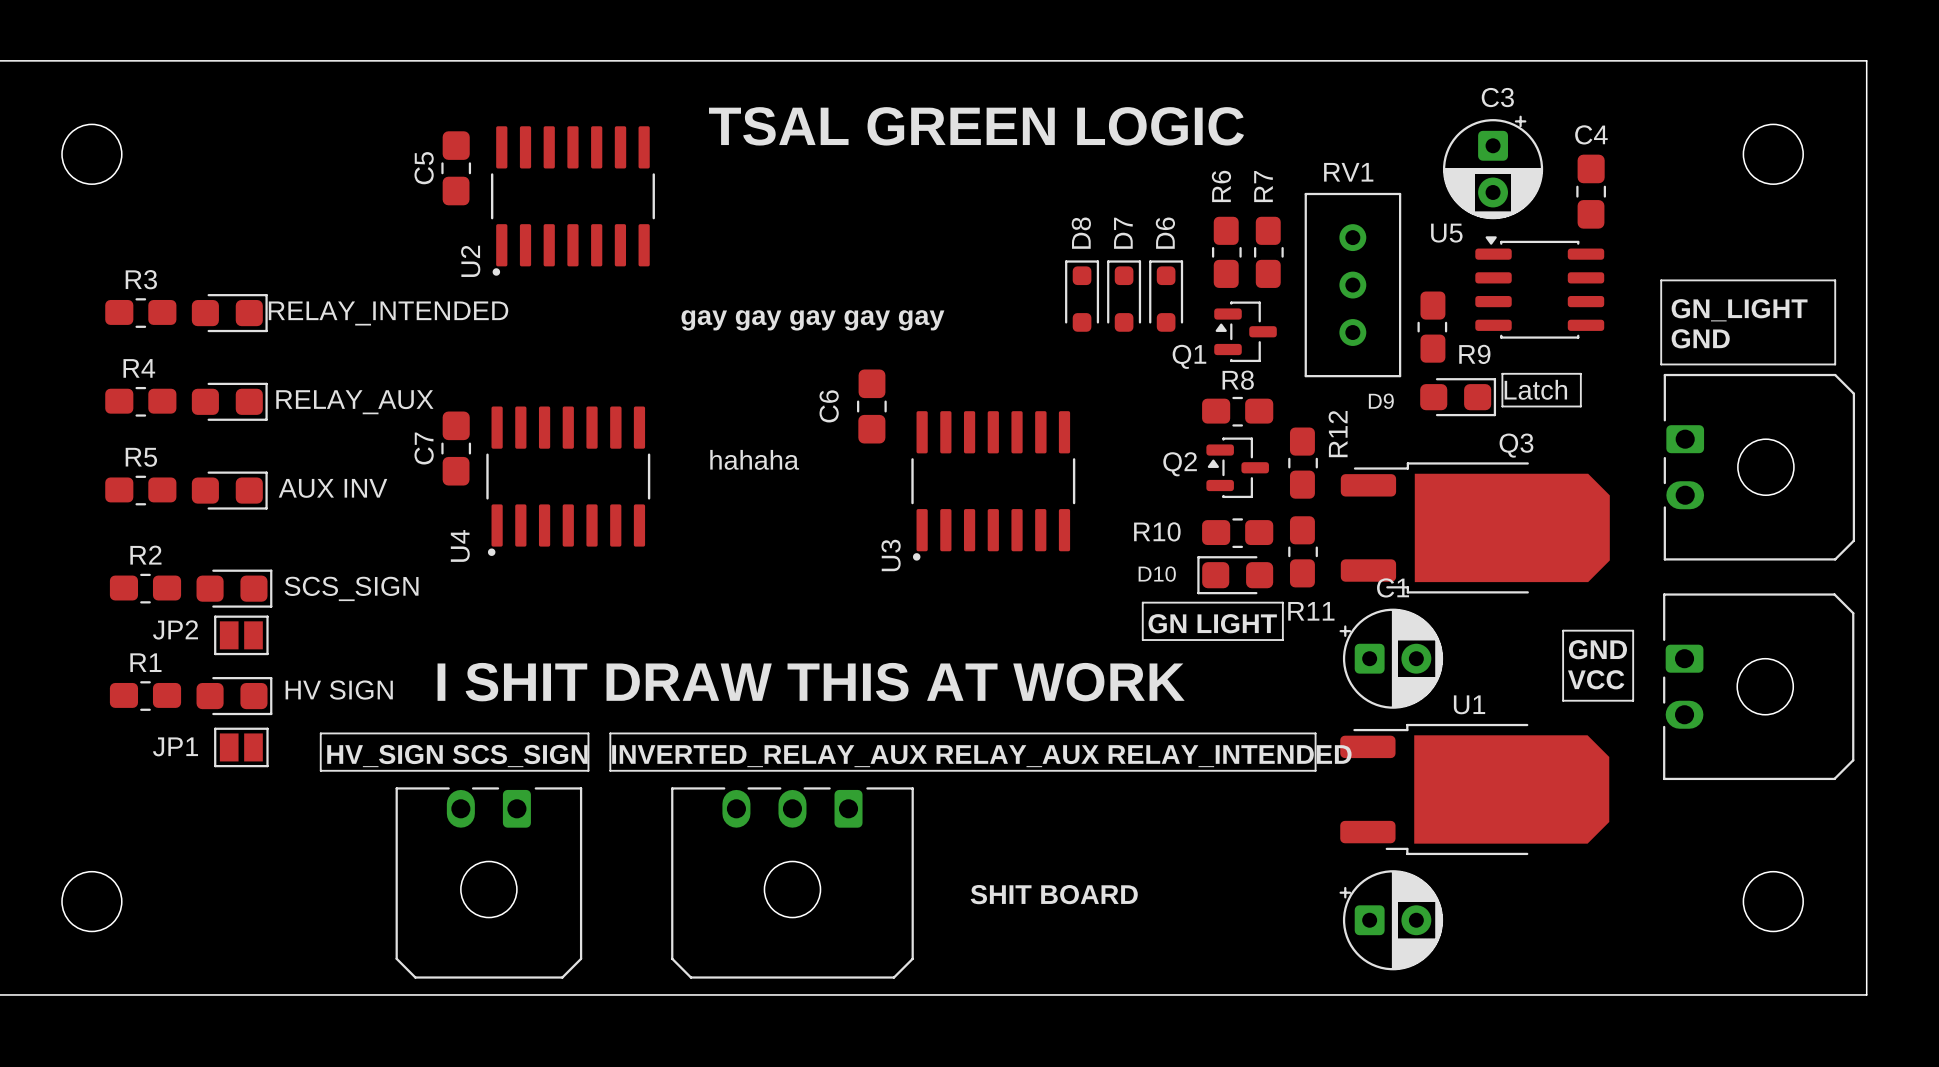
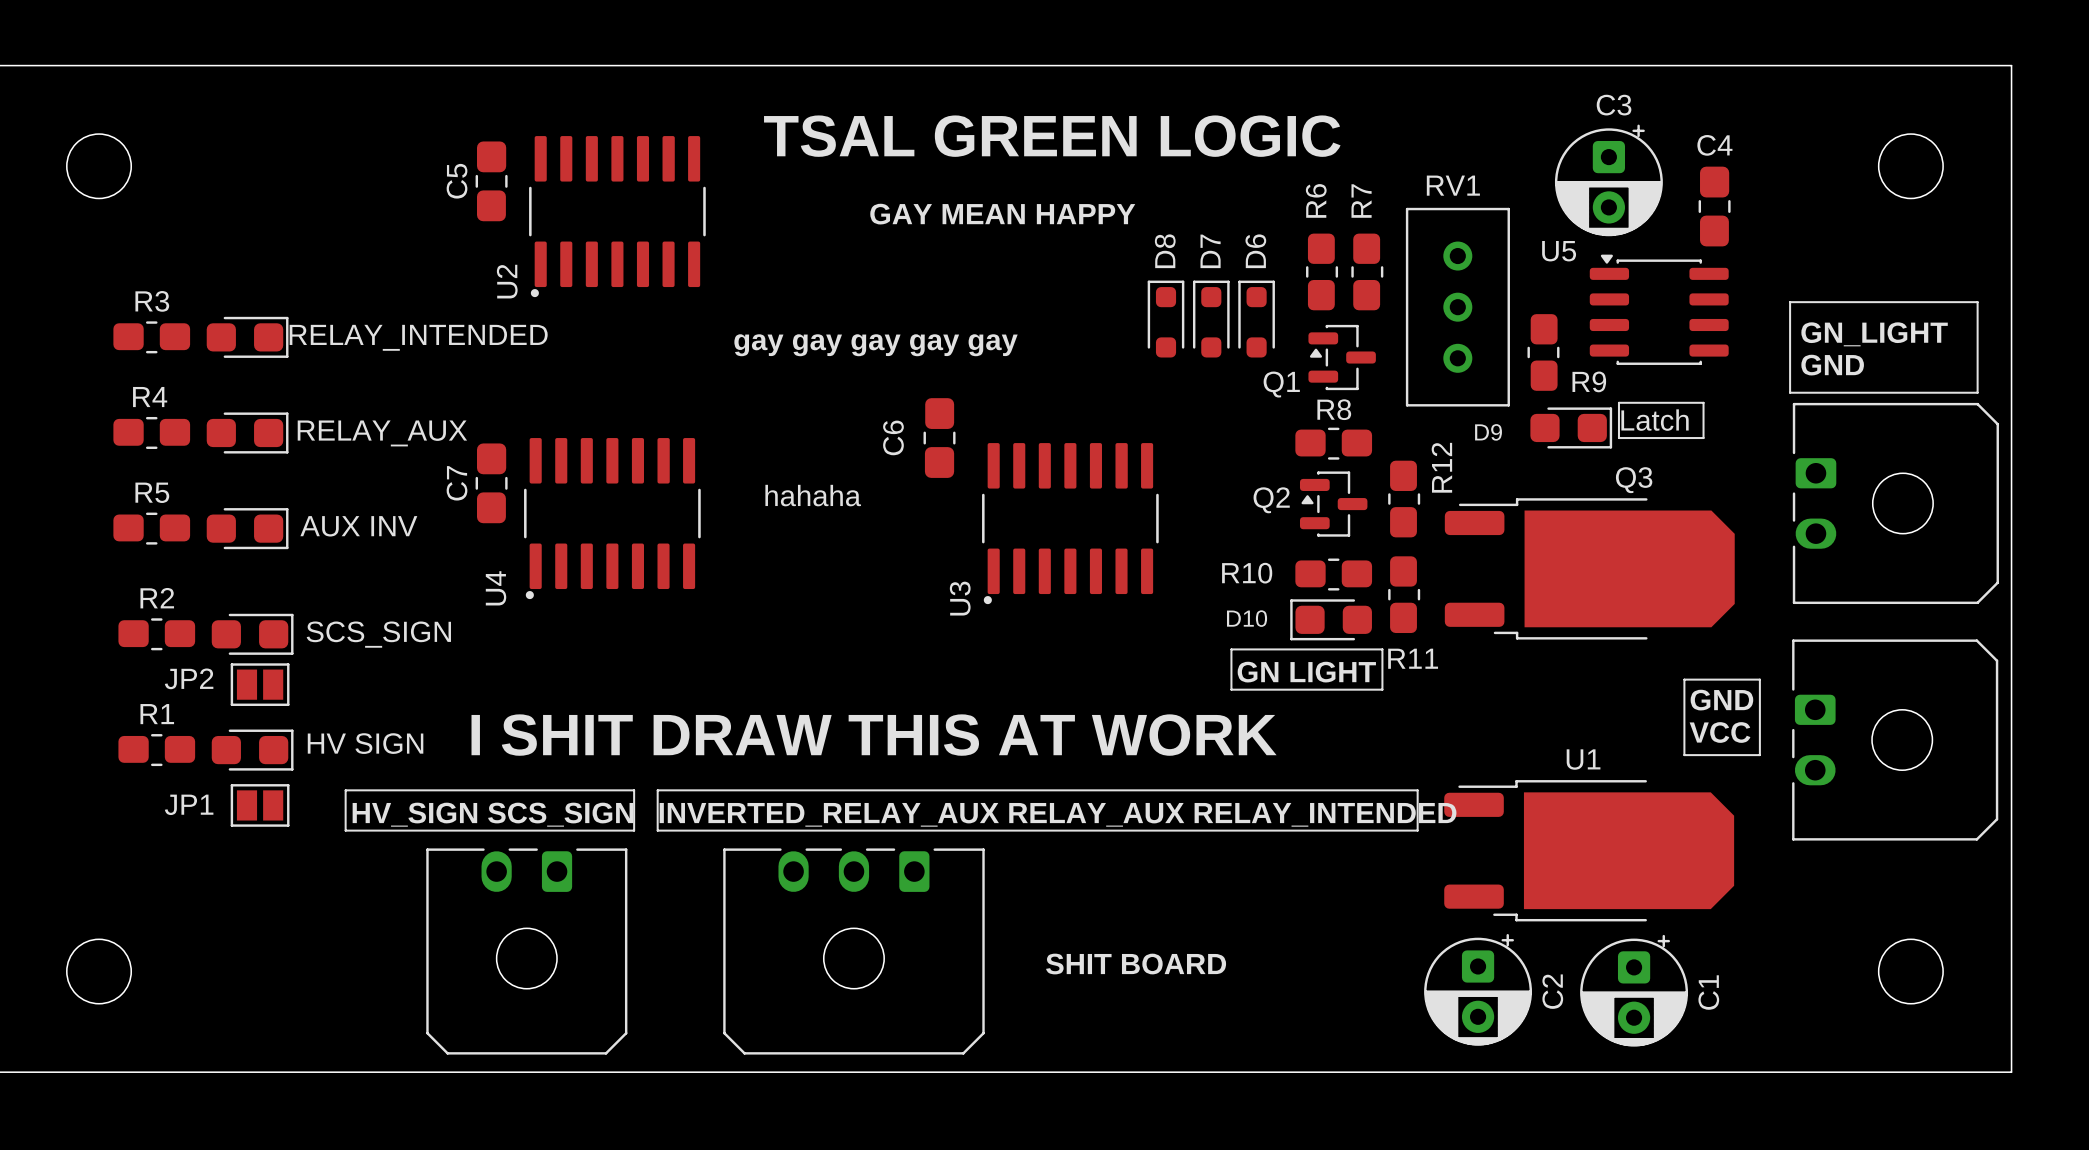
text: none -> GAY MEAN HAPPY (1002, 214)
C1 rotation: 0° (1391, 658) -> 90° clockwise (1634, 990)
C1 position: (1391, 658) -> (1634, 990)
C2: none -> (1478, 989)
part: (1391, 920) -> none

